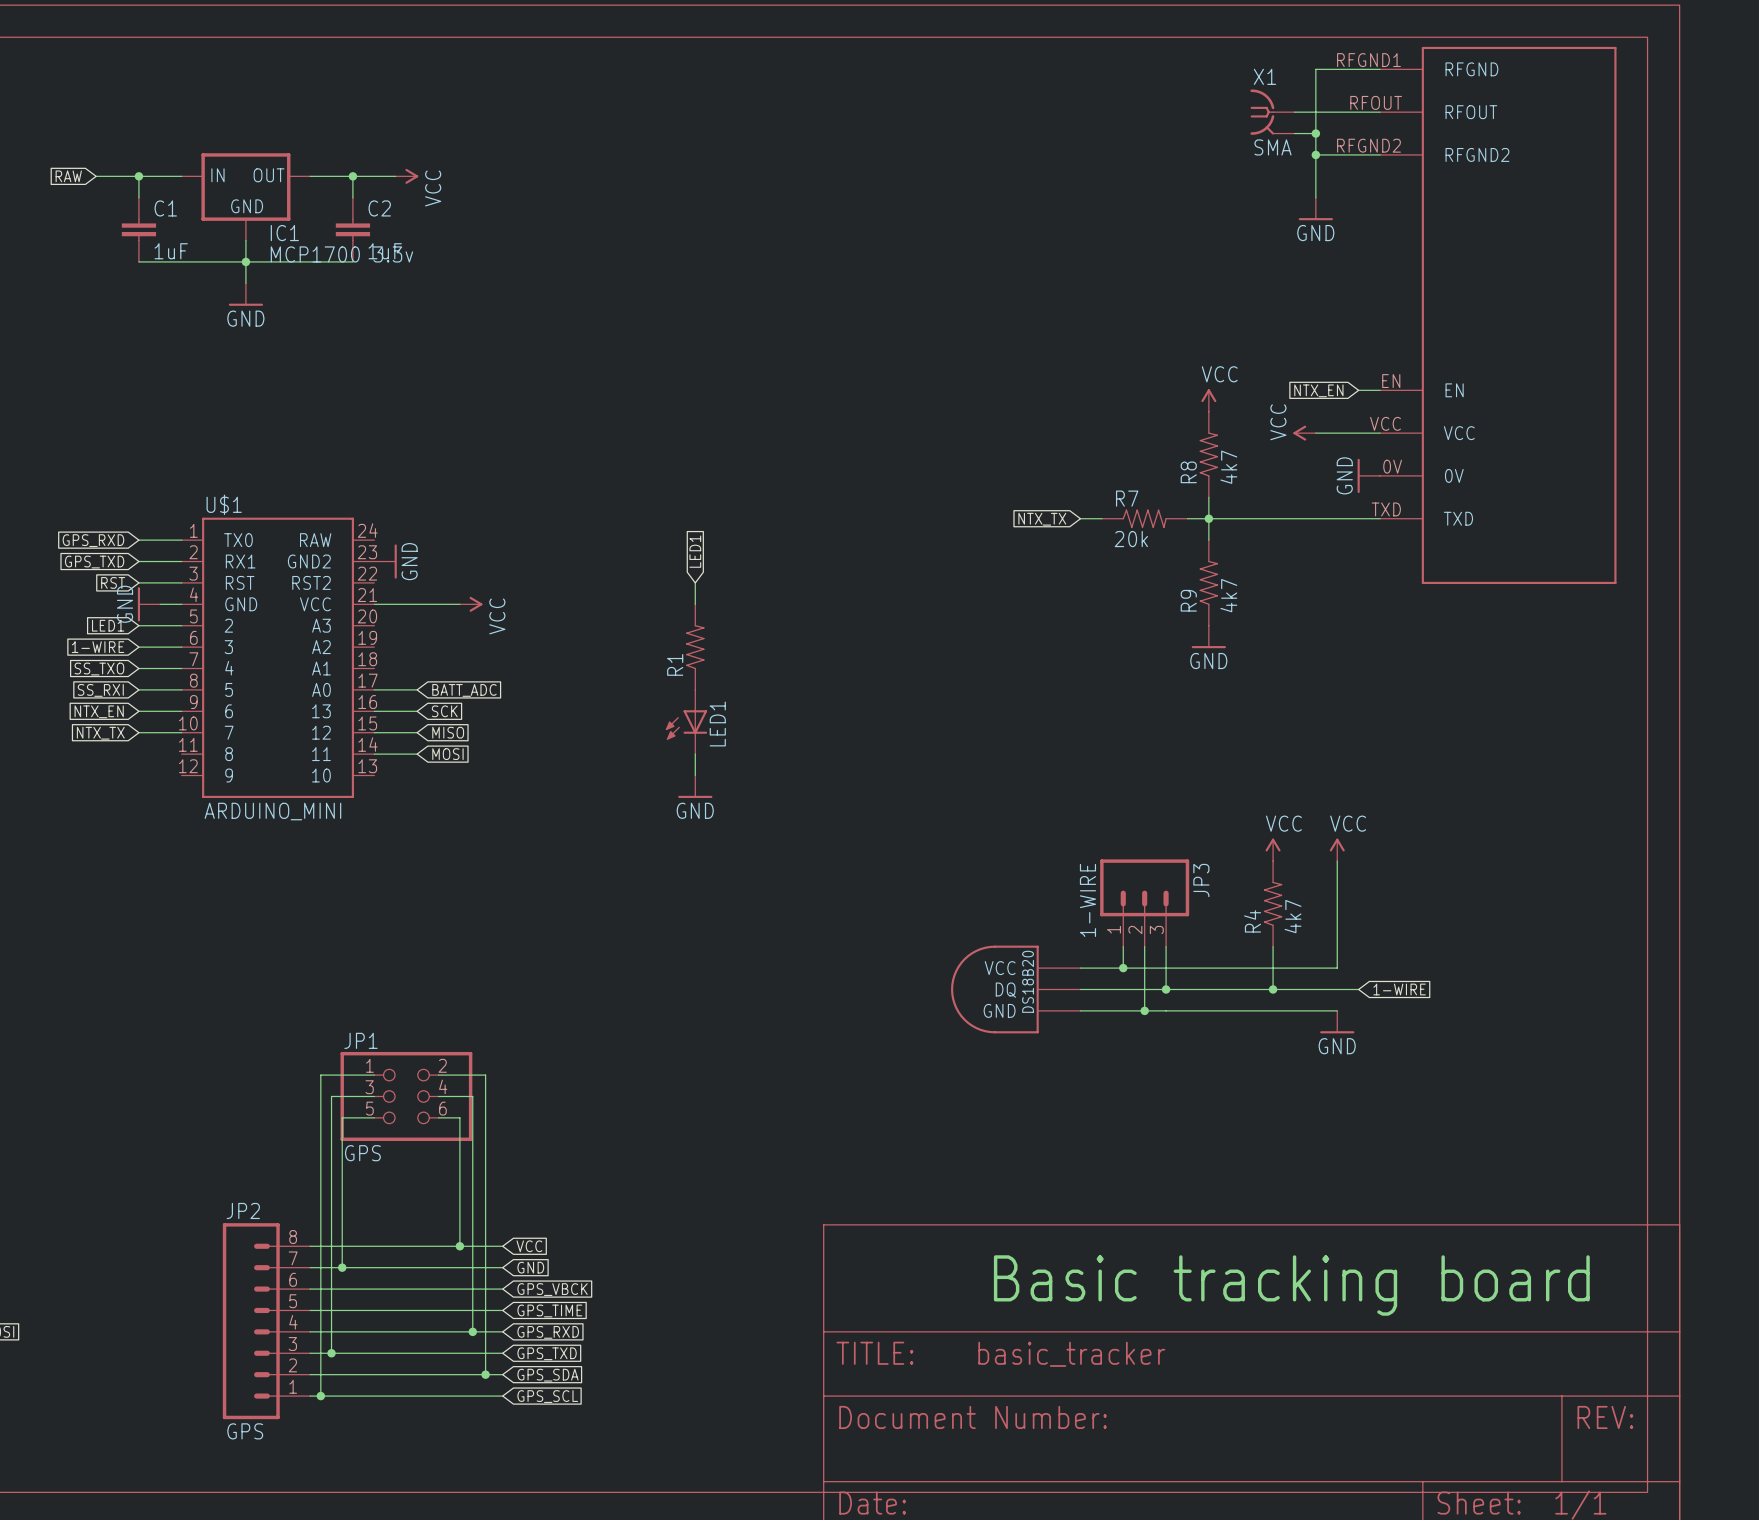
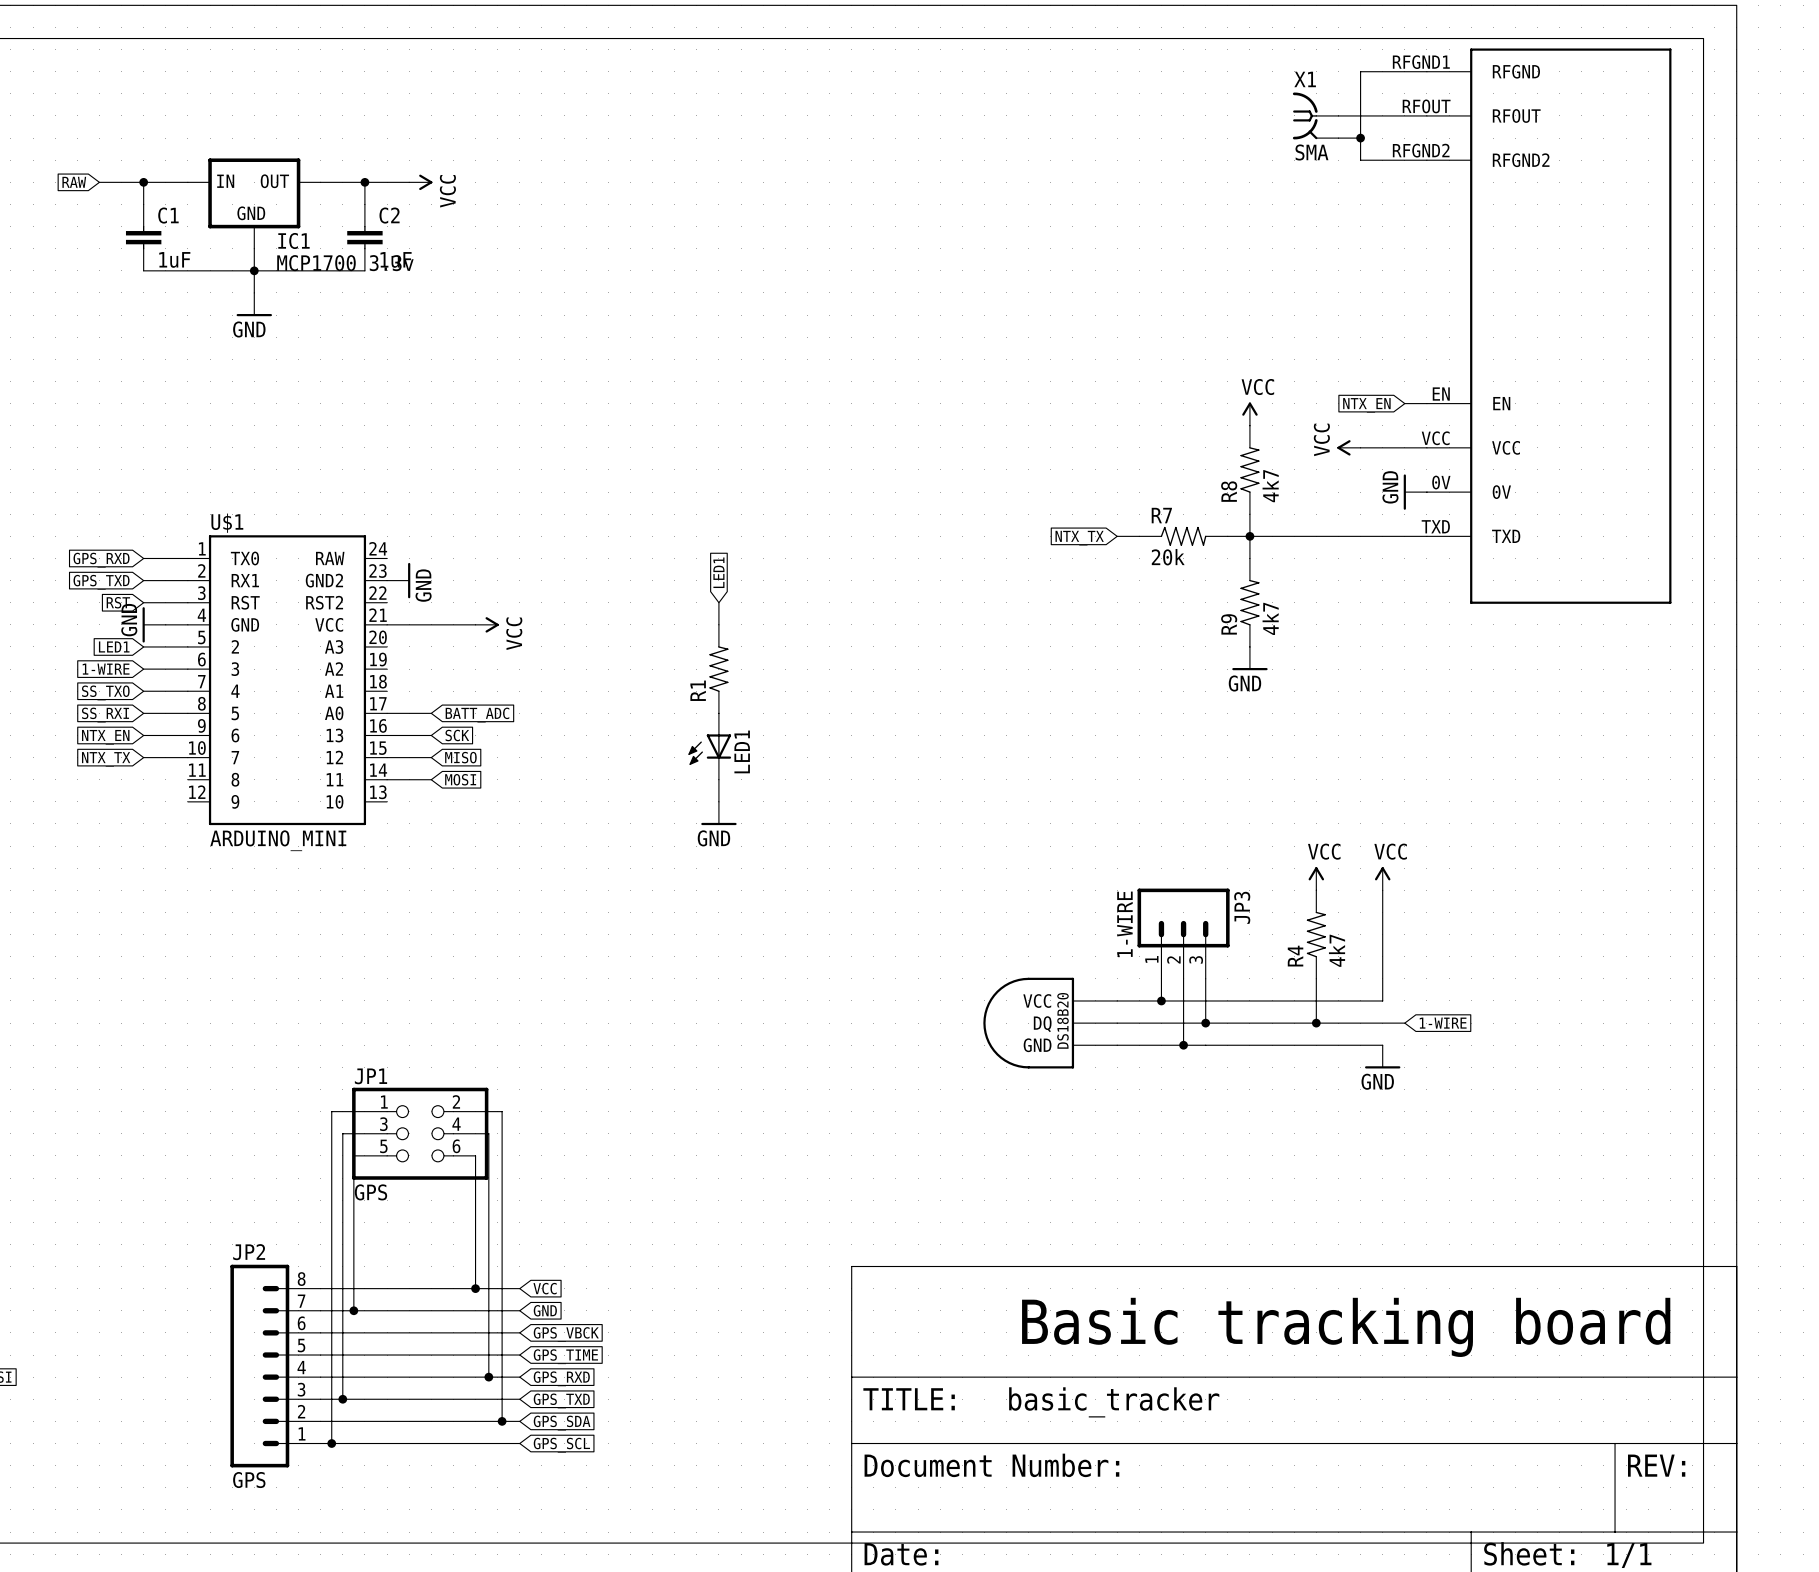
wire: (1315, 154) (1315, 197) -> none
junction: (1315, 154) -> none
power symbol: GND (1315, 208) -> none

